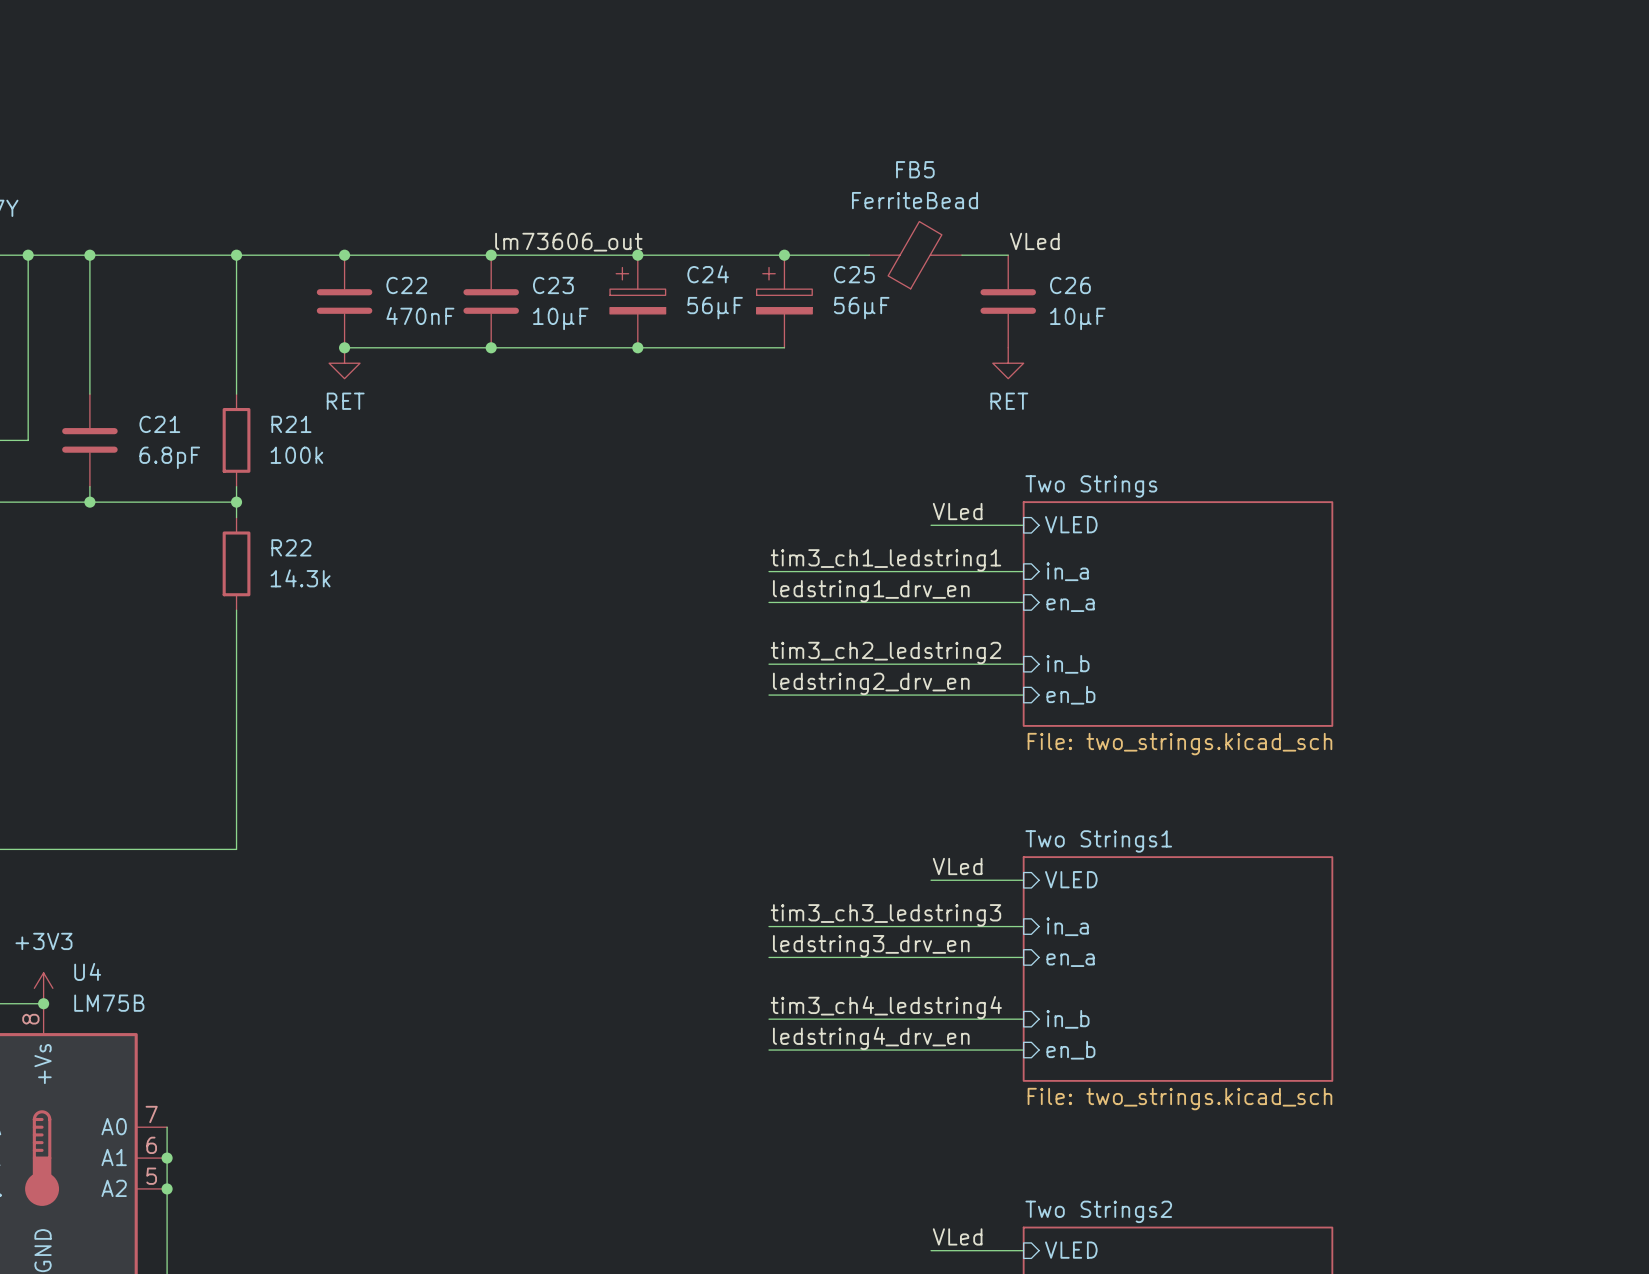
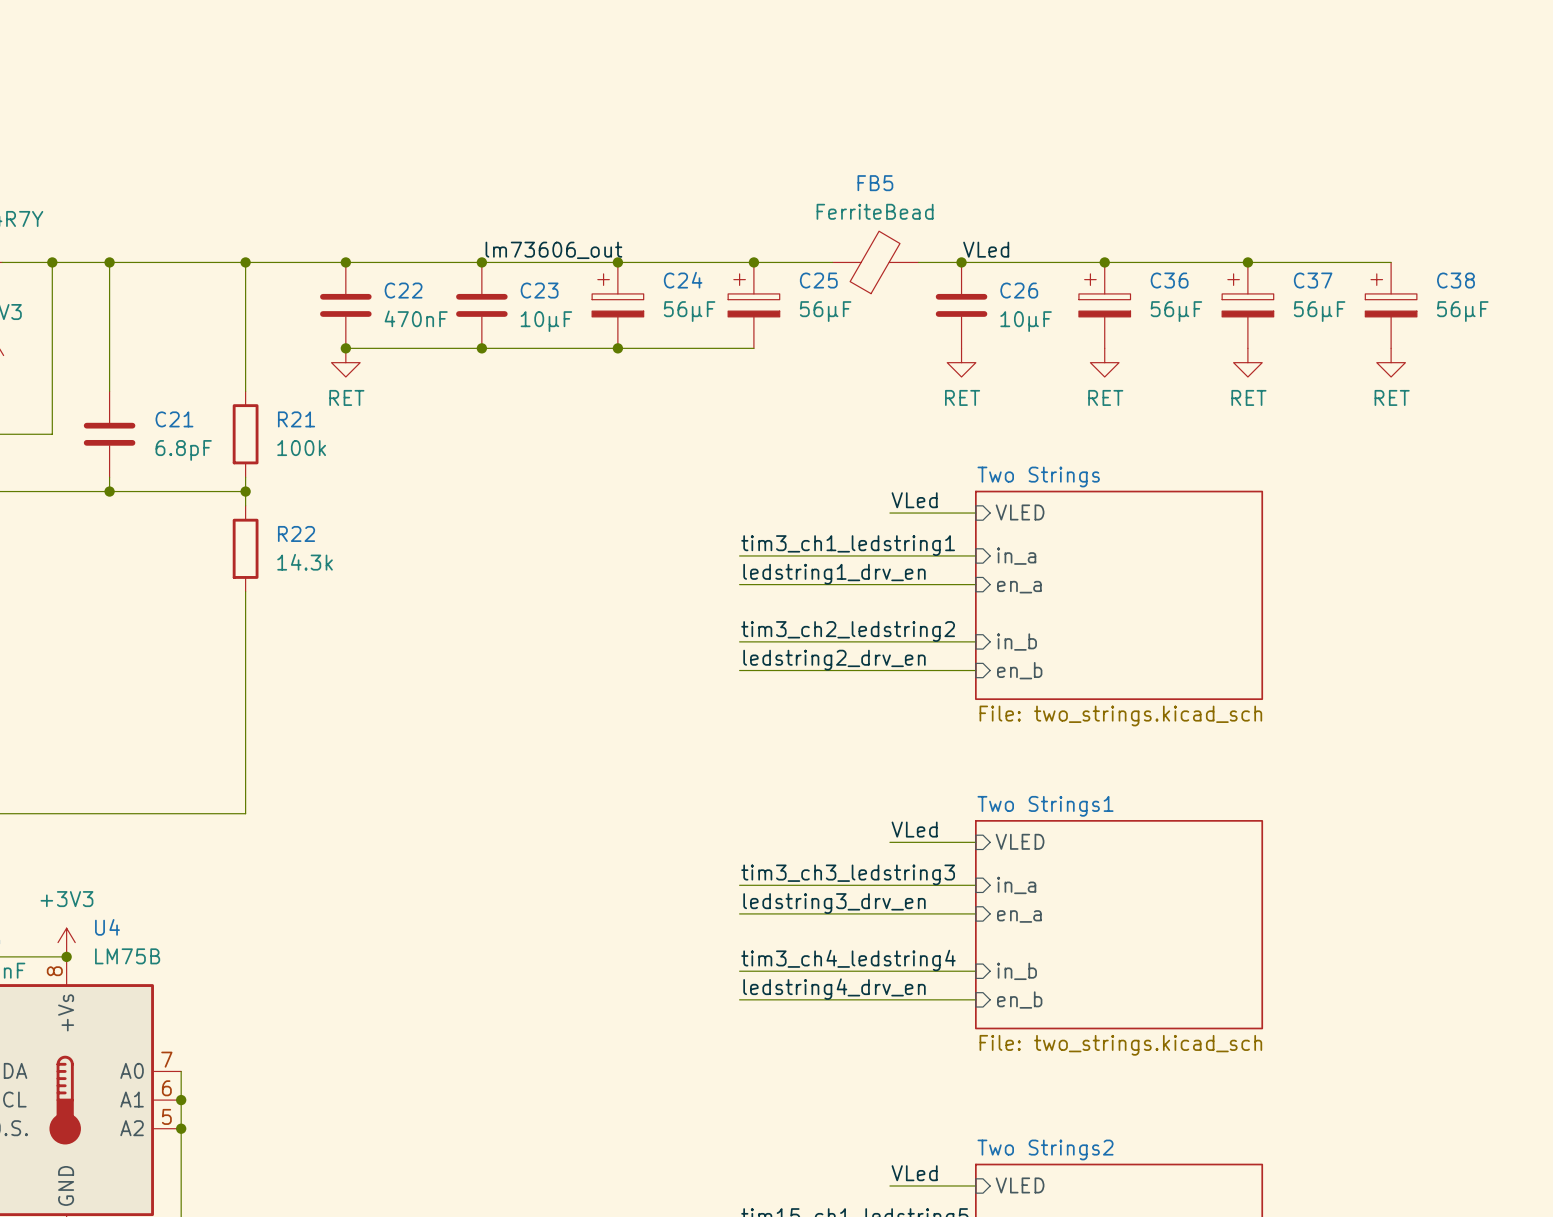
wire: none -> (961, 262) (1391, 262)
junction: none -> (961, 262)
junction: none -> (1104, 262)
junction: none -> (1247, 262)
C36: none -> 56µF (1104, 305)
C37: none -> 56µF (1247, 305)
C38: none -> 56µF (1391, 305)
power symbol: none -> RET (1104, 362)
power symbol: none -> RET (1247, 362)
power symbol: none -> RET (1391, 362)

